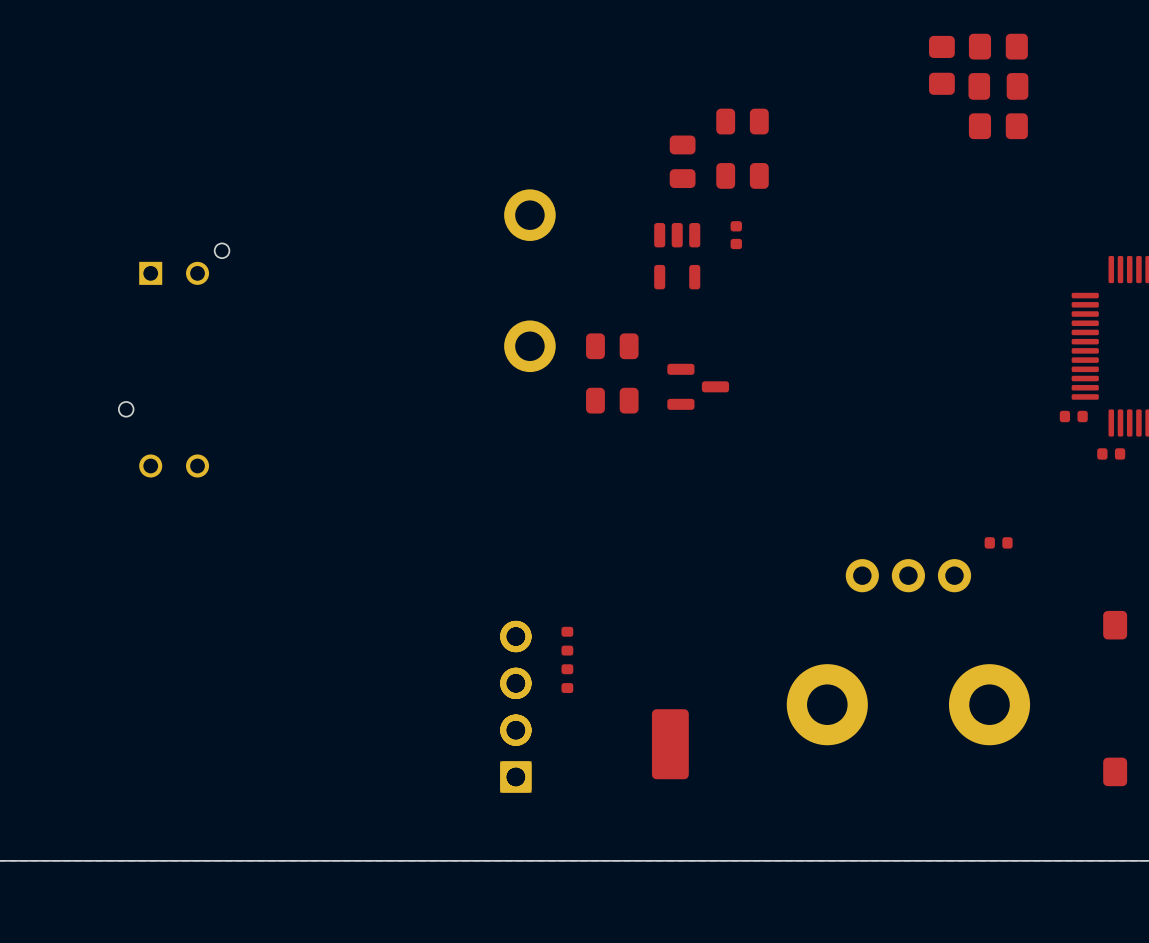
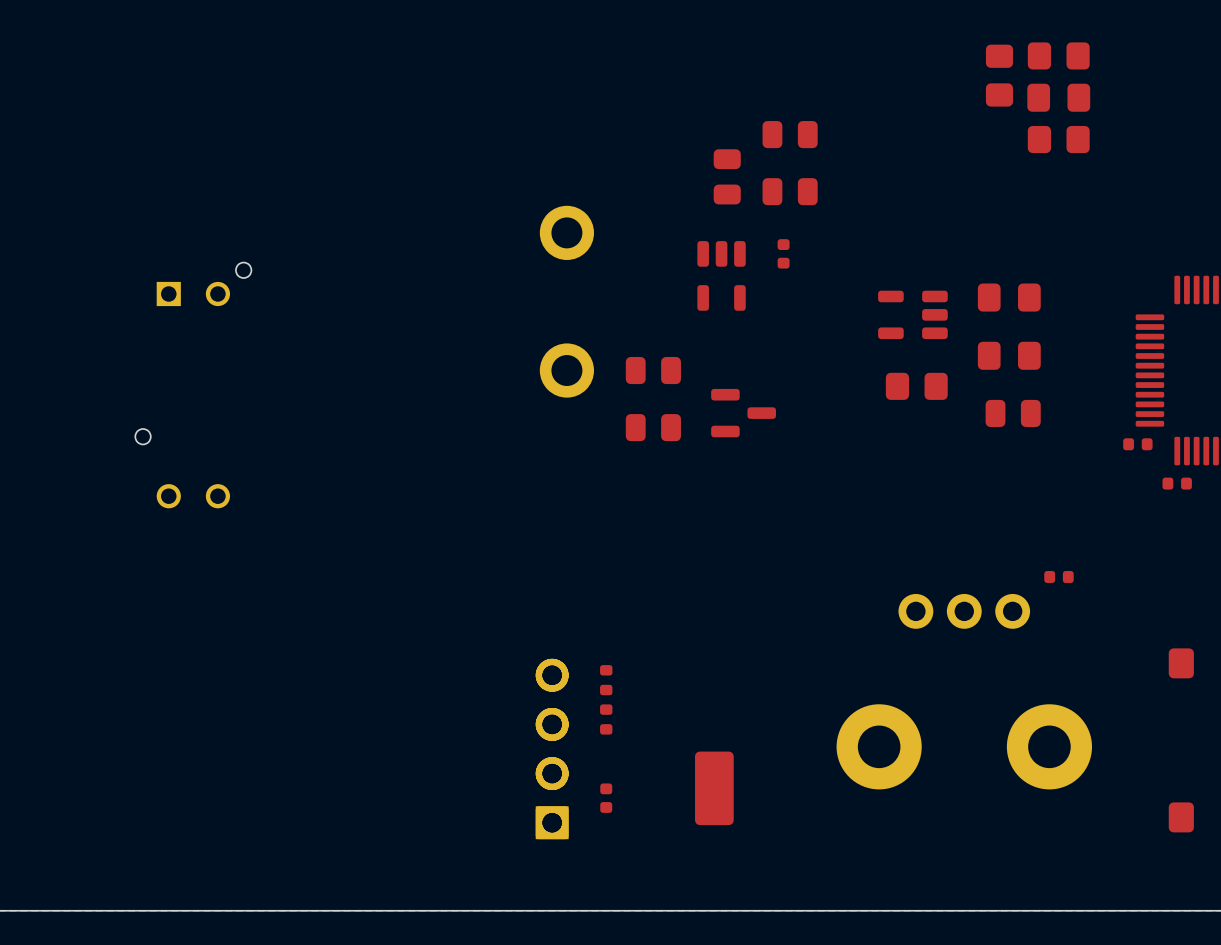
part: none -> (1009, 297)
part: none -> (912, 314)
part: none -> (1009, 355)
part: none -> (916, 386)
part: none -> (1013, 413)
part: none -> (606, 798)

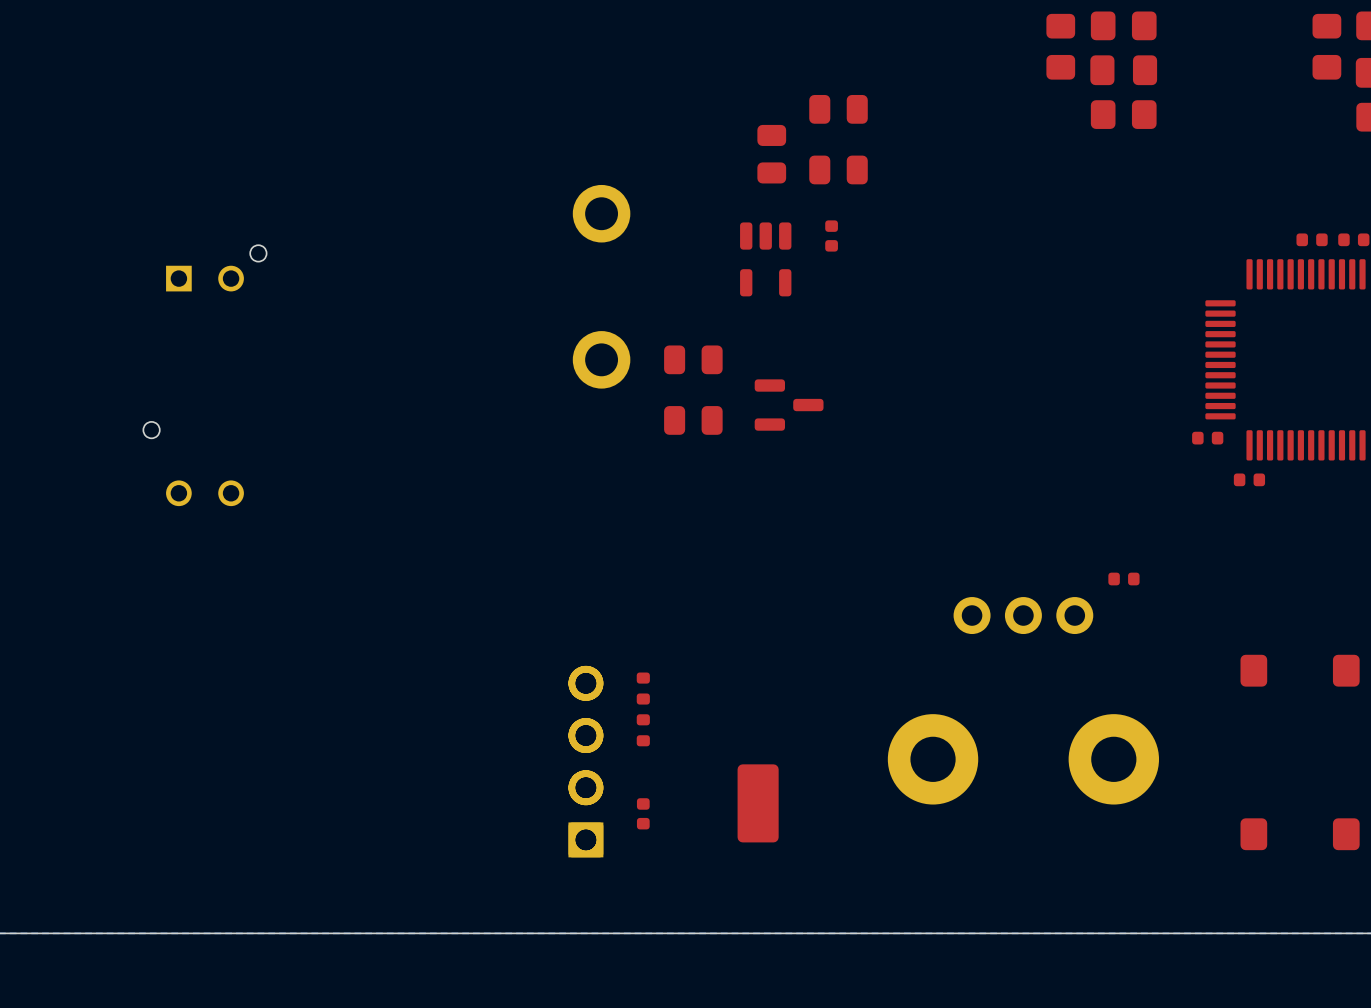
part: (1009, 297) -> none
part: (912, 314) -> none
part: (1009, 355) -> none
part: (916, 386) -> none
part: (1013, 413) -> none

